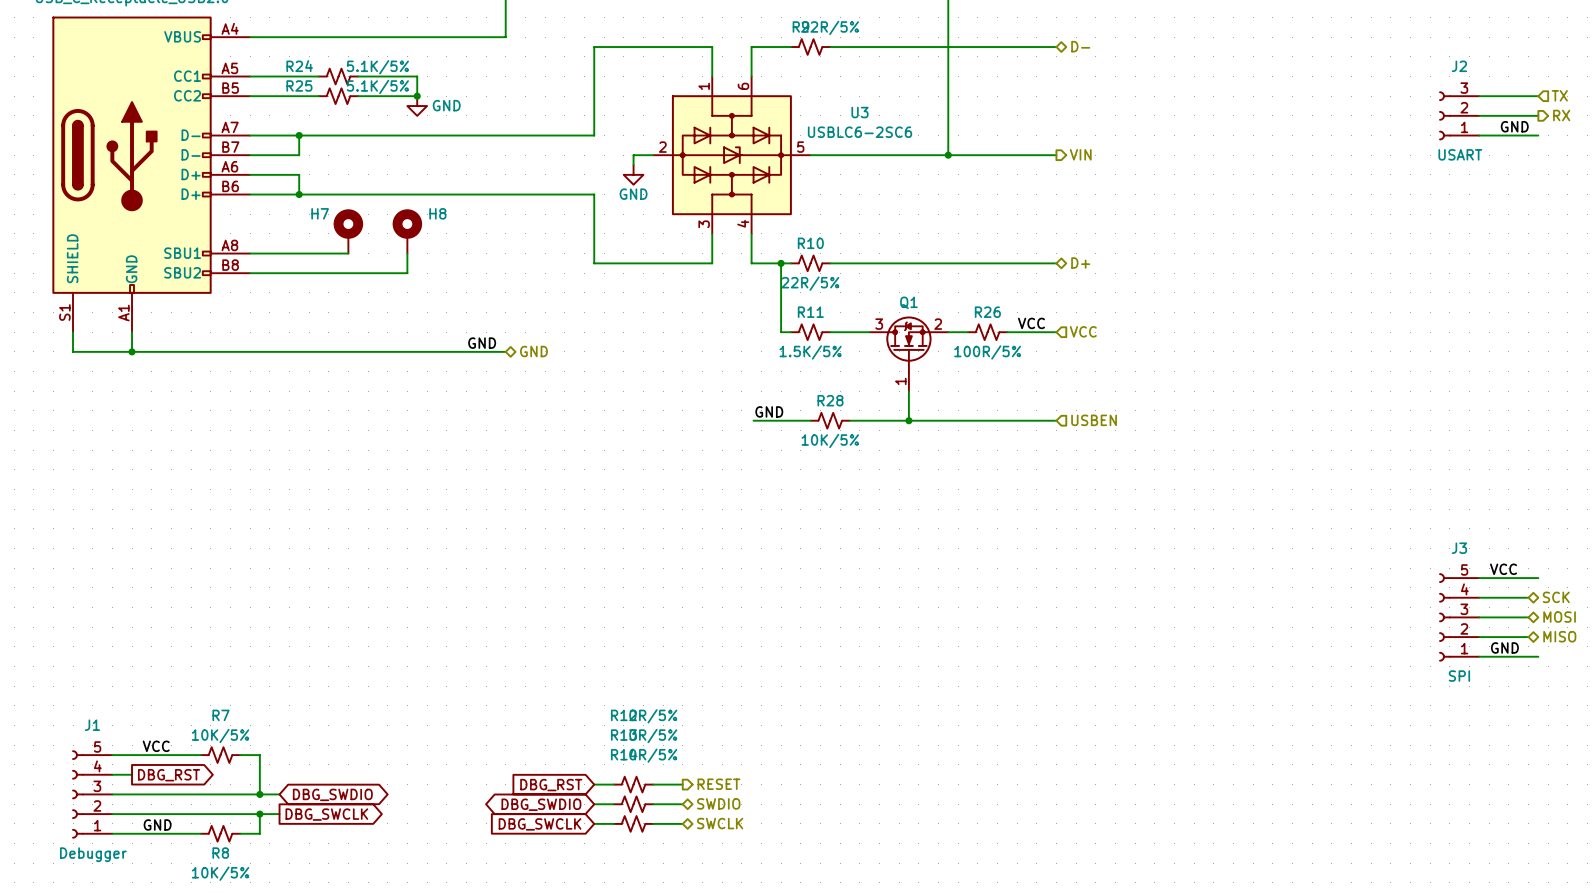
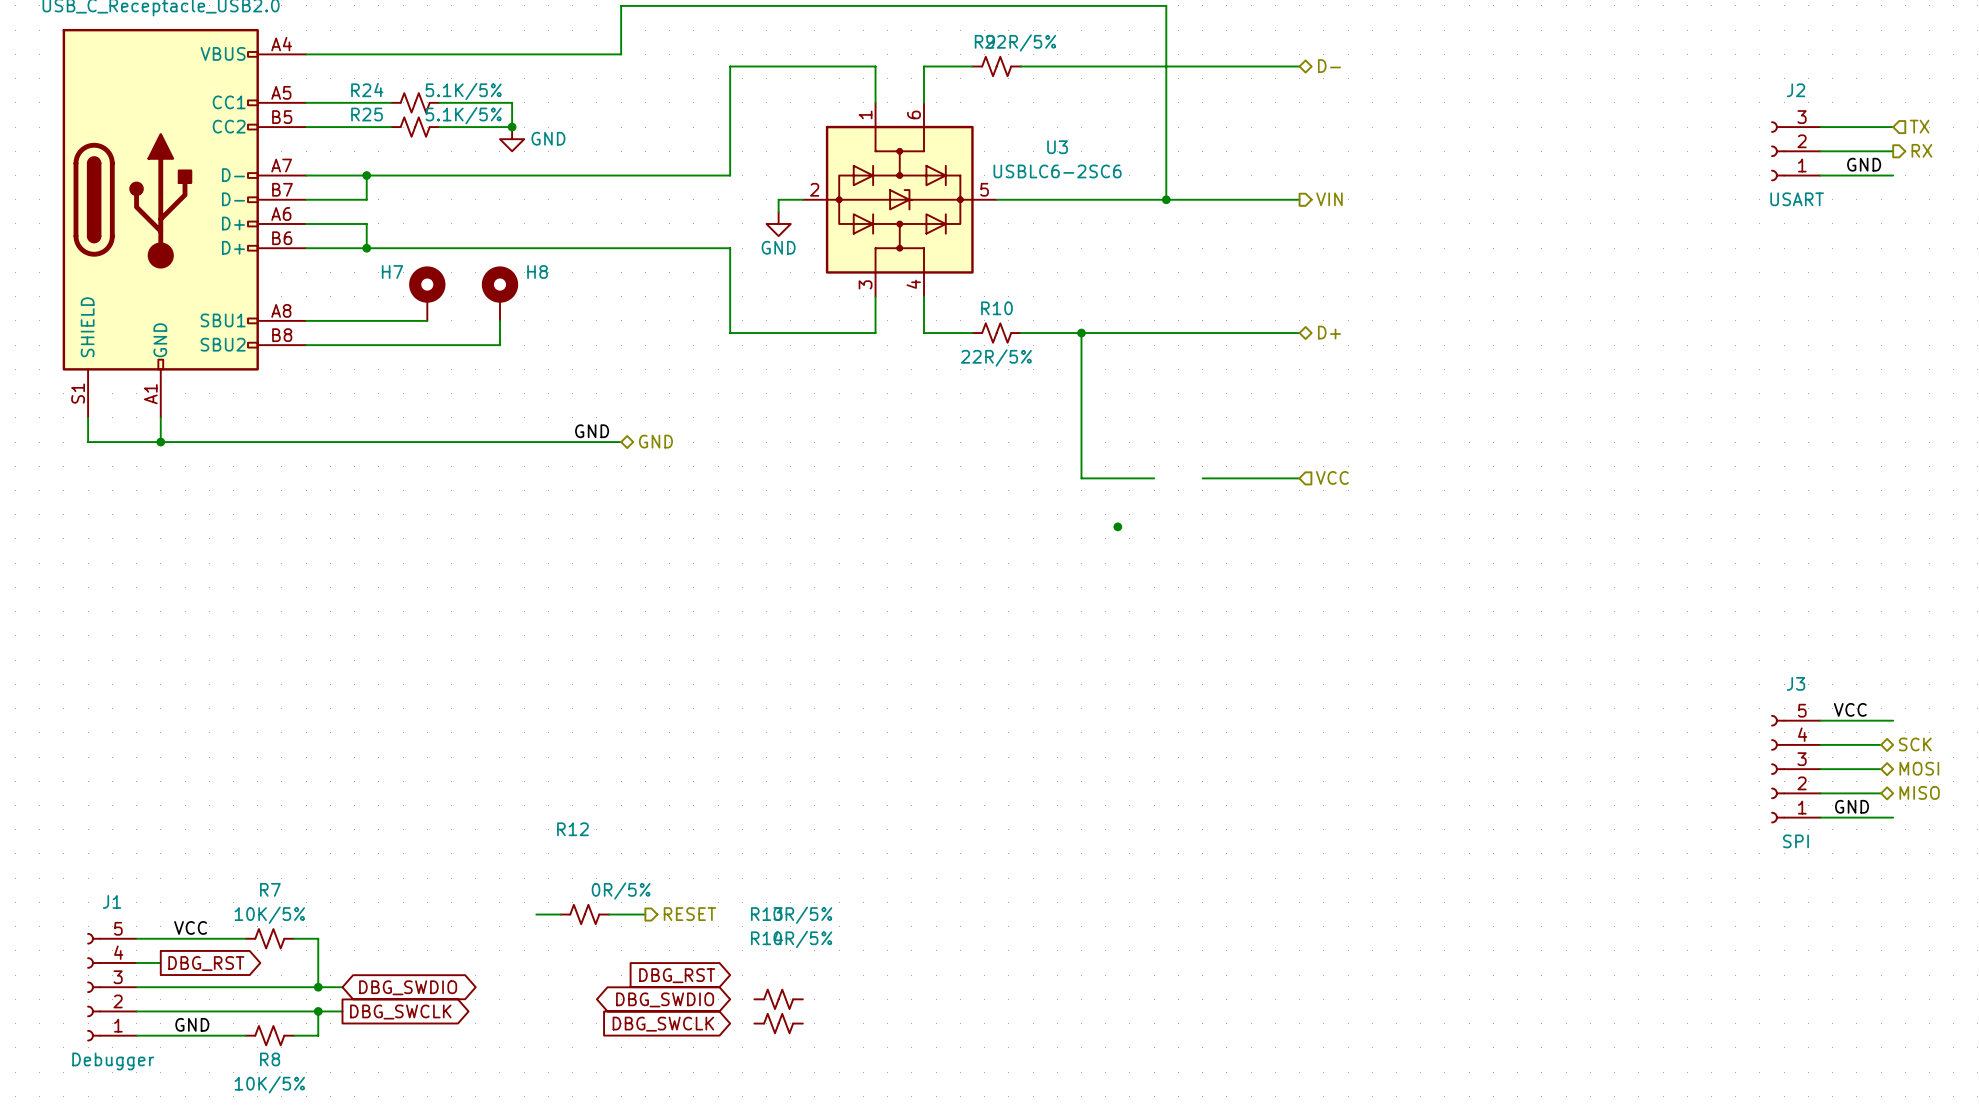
wire: (781, 263) (781, 332) (790, 332) -> none
junction: (781, 263) -> none
wire: none -> (1081, 333) (1081, 478) (1154, 478)
junction: none -> (1081, 333)
label: VCC (1031, 323) -> none
hierarchical label position: VCC (1083, 331) -> VCC (1332, 477)
R11: 1.5K/5% (810, 332) -> none
wire: (830, 332) (869, 332) -> none
wire: (948, 332) (967, 332) -> none
R26: 100R/5% (987, 332) -> none
wire: (1007, 332) (1056, 332) -> none
Q1: (908, 353) -> none
wire: none -> (1202, 478) (1299, 478)
wire: (908, 391) (908, 420) -> none
label: GND (769, 411) -> none
wire: (753, 420) (810, 420) -> none
R28: 10K/5% (830, 420) -> none
wire: (849, 420) (1056, 420) -> none
hierarchical label: USBEN (1094, 420) -> none
R12 value position: 0R/5% (653, 716) -> 0R/5% (621, 891)
wire: (594, 784) (613, 784) -> (536, 914) (560, 914)
R12 position: (633, 784) -> (584, 914)
wire: (653, 784) (682, 784) -> (609, 914) (645, 914)
hierarchical label position: RESET (718, 784) -> RESET (689, 914)
hierarchical label: SWDIO (718, 803) -> none
wire: (594, 804) (613, 804) -> none
wire: (653, 804) (682, 804) -> none
wire: (594, 823) (613, 823) -> none
wire: (653, 823) (682, 823) -> none
hierarchical label: SWCLK (720, 823) -> none

